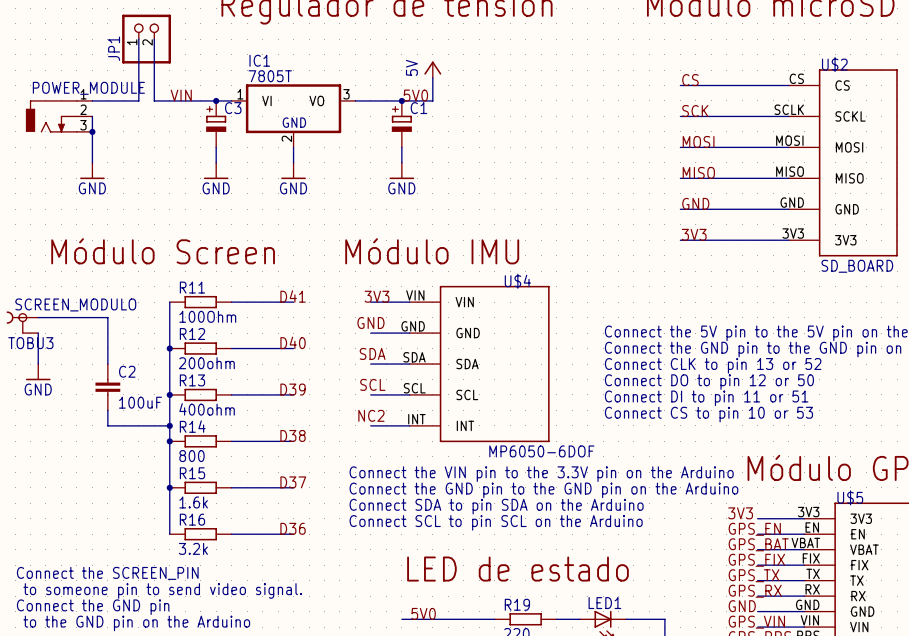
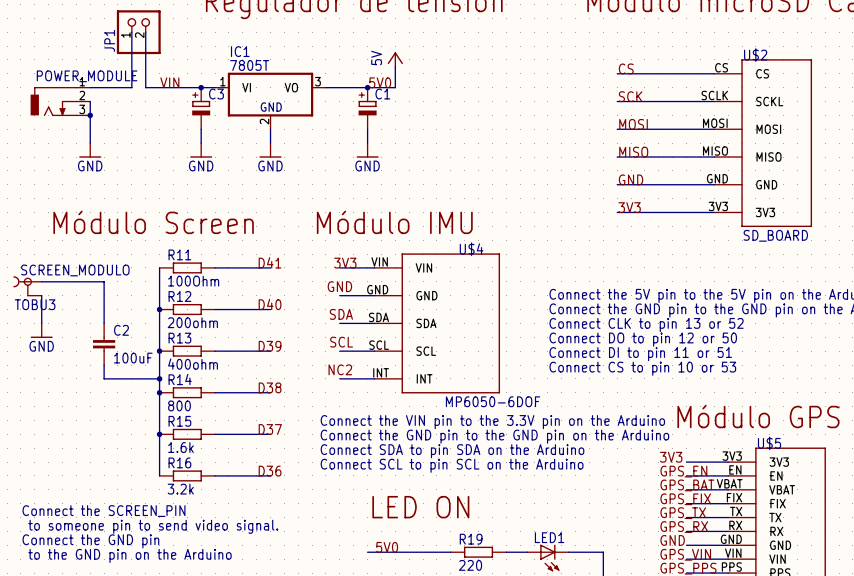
text: LED de estado (517, 569) -> LED ON (420, 507)

